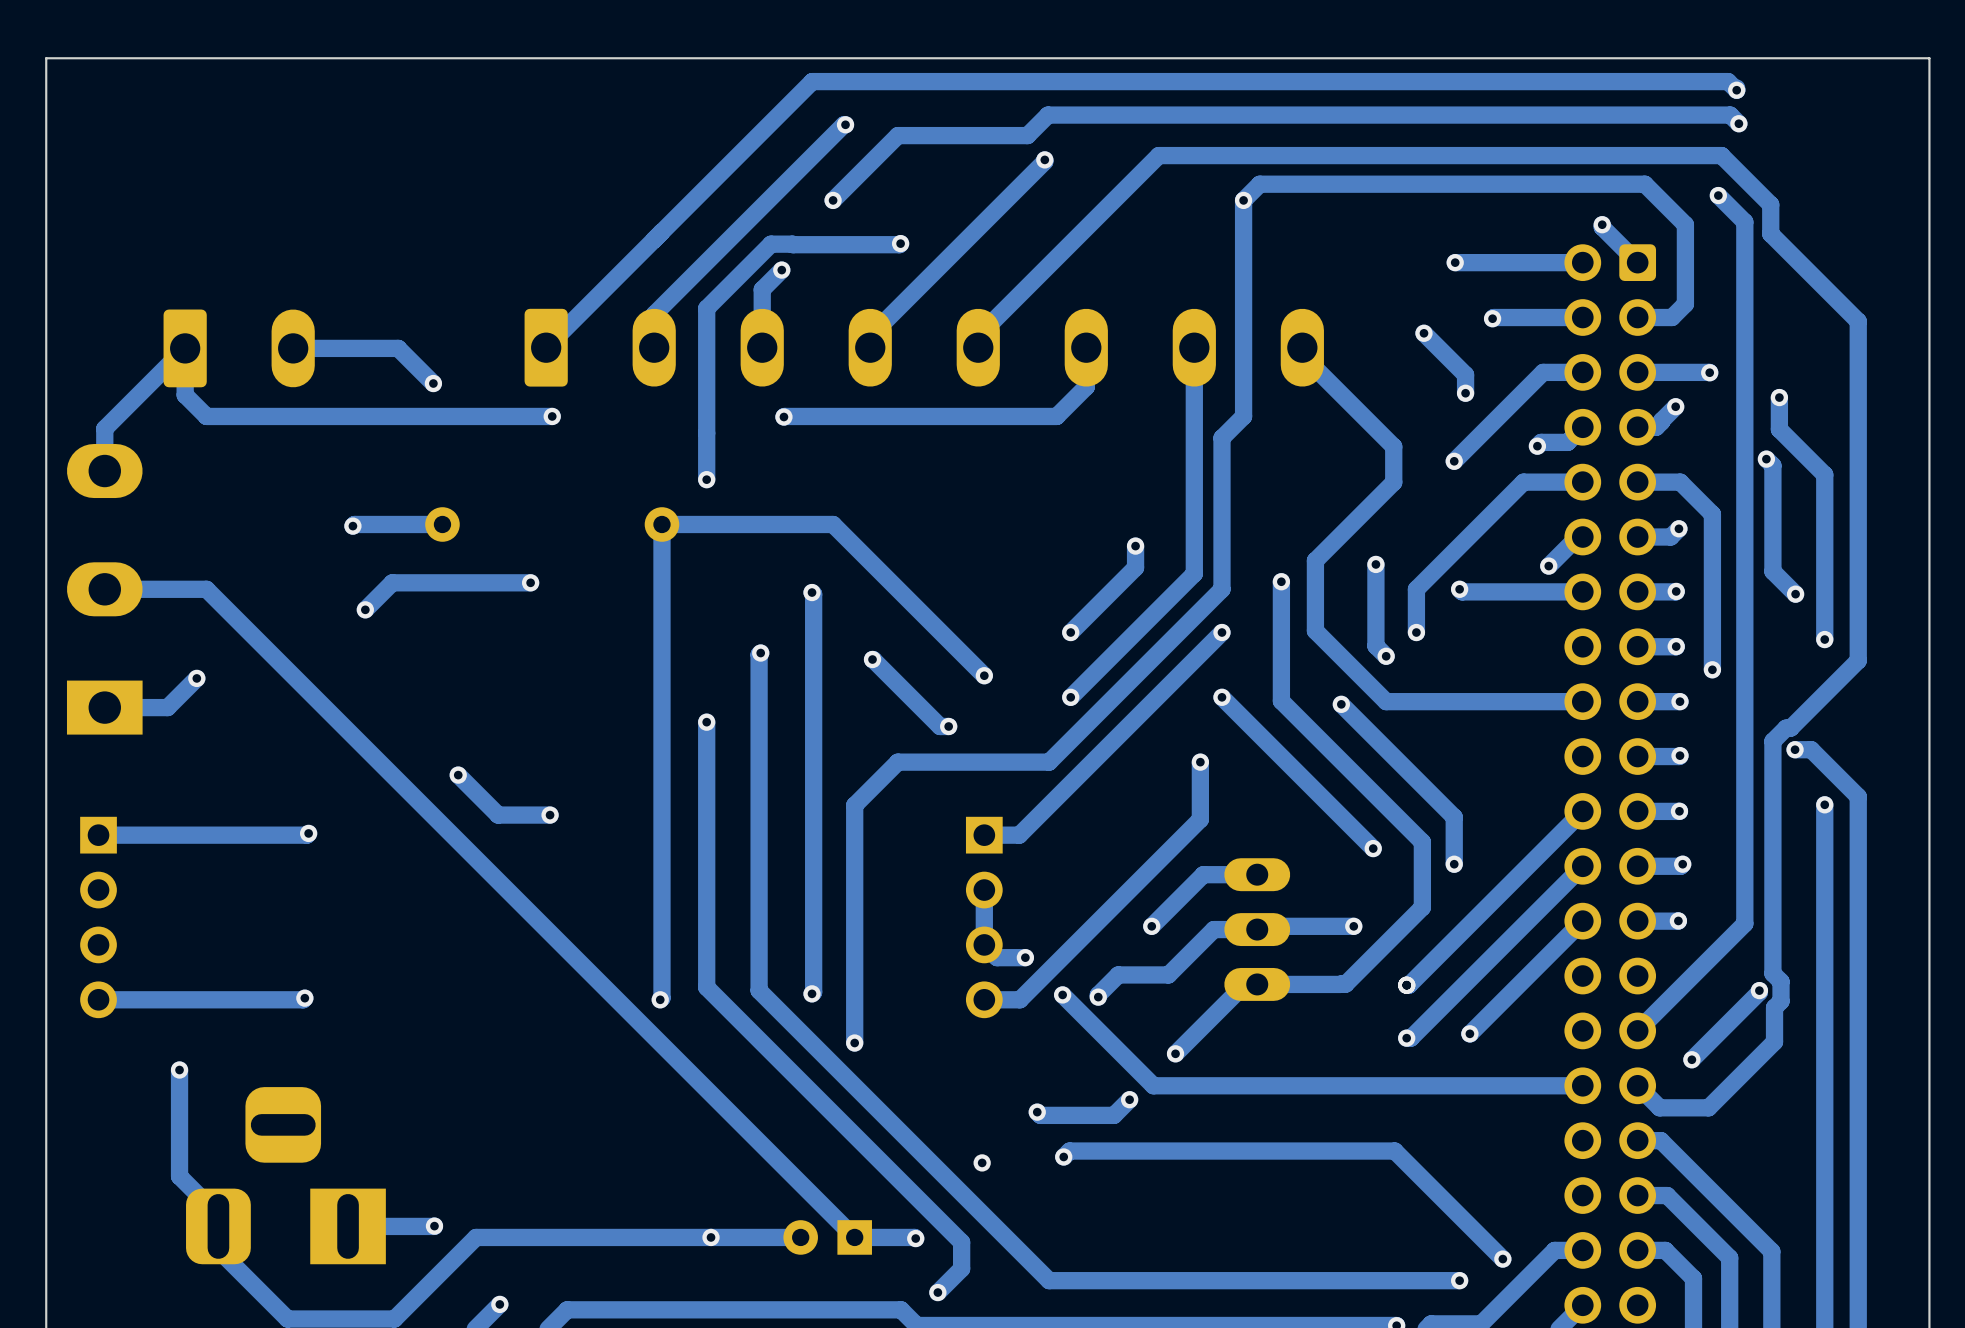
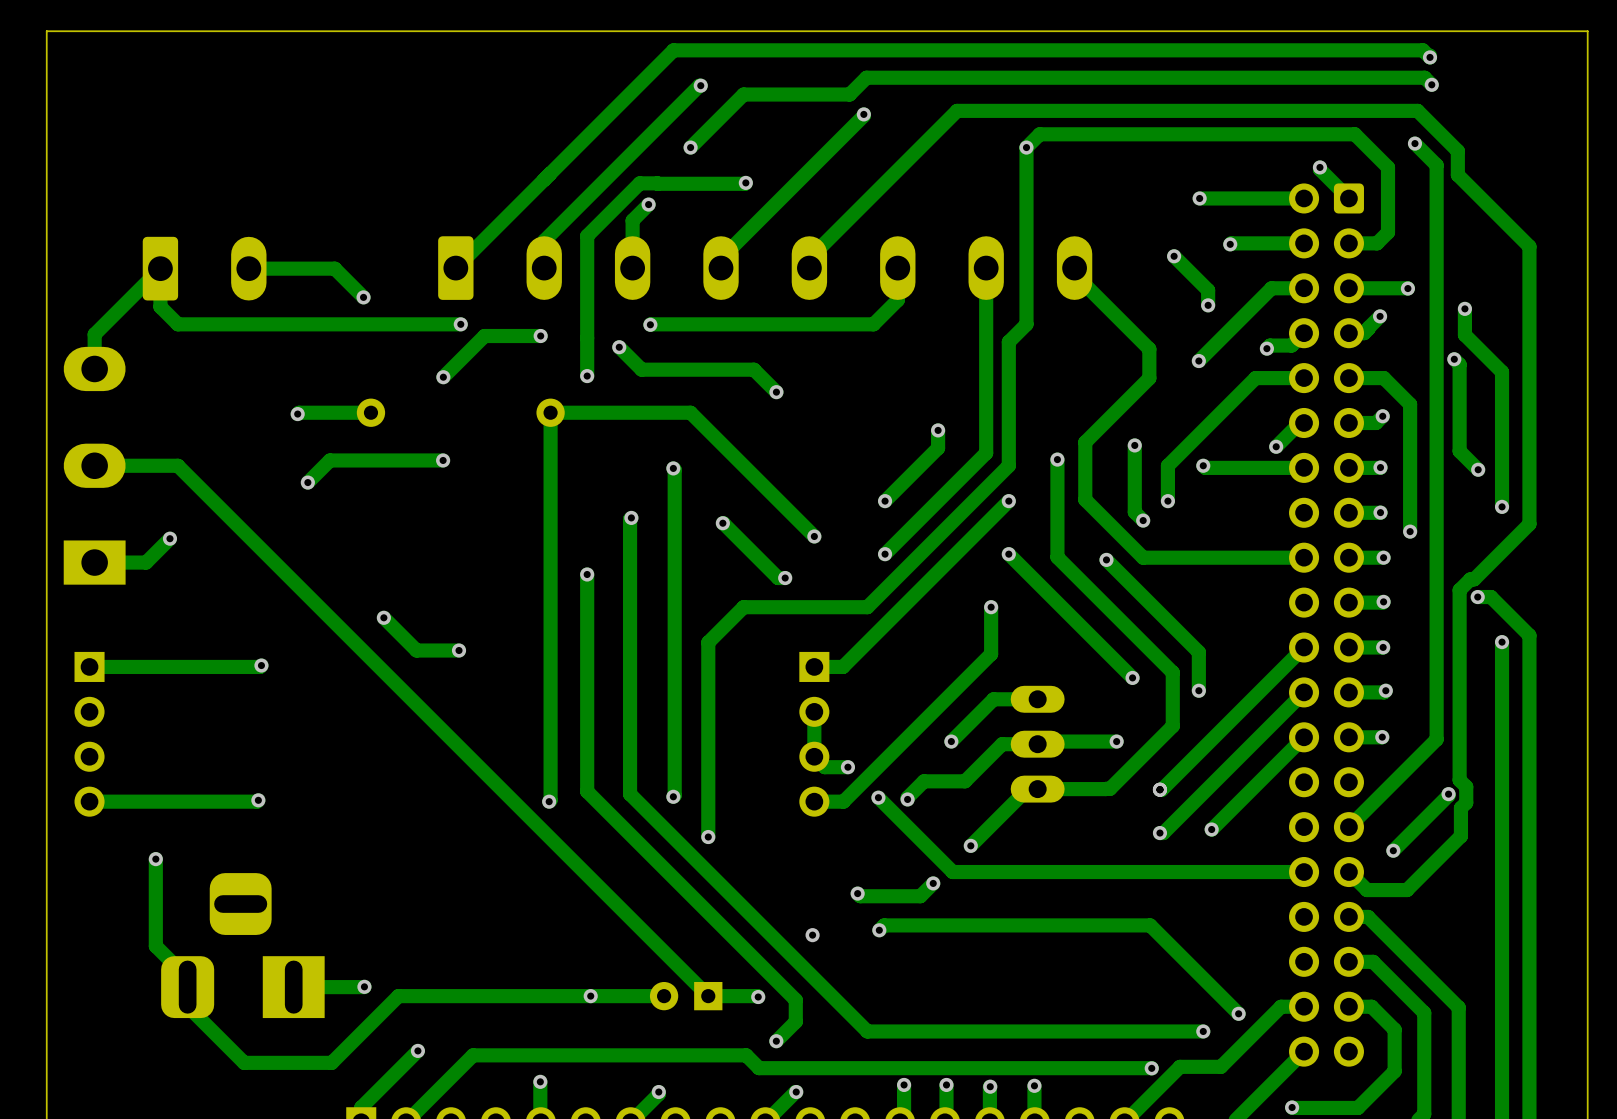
track: none -> (540, 336) (484, 336) (443, 377)
via: none -> (540, 336)
track: none -> (619, 347) (641, 369) (753, 369) (776, 392)
via: none -> (619, 347)
via: none -> (443, 377)
via: none -> (776, 392)

